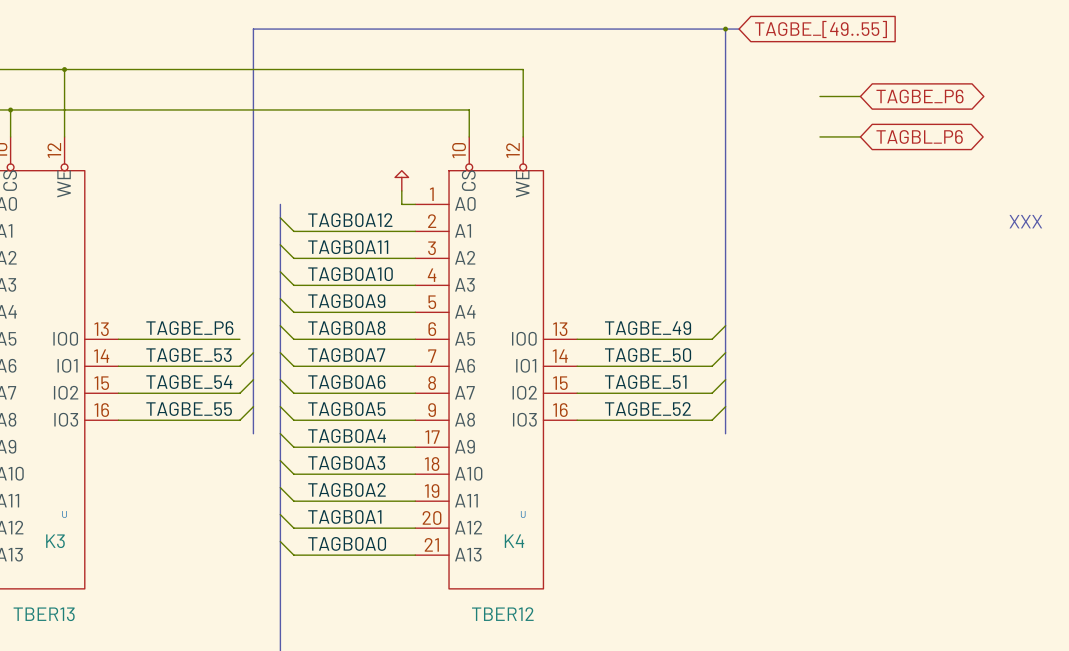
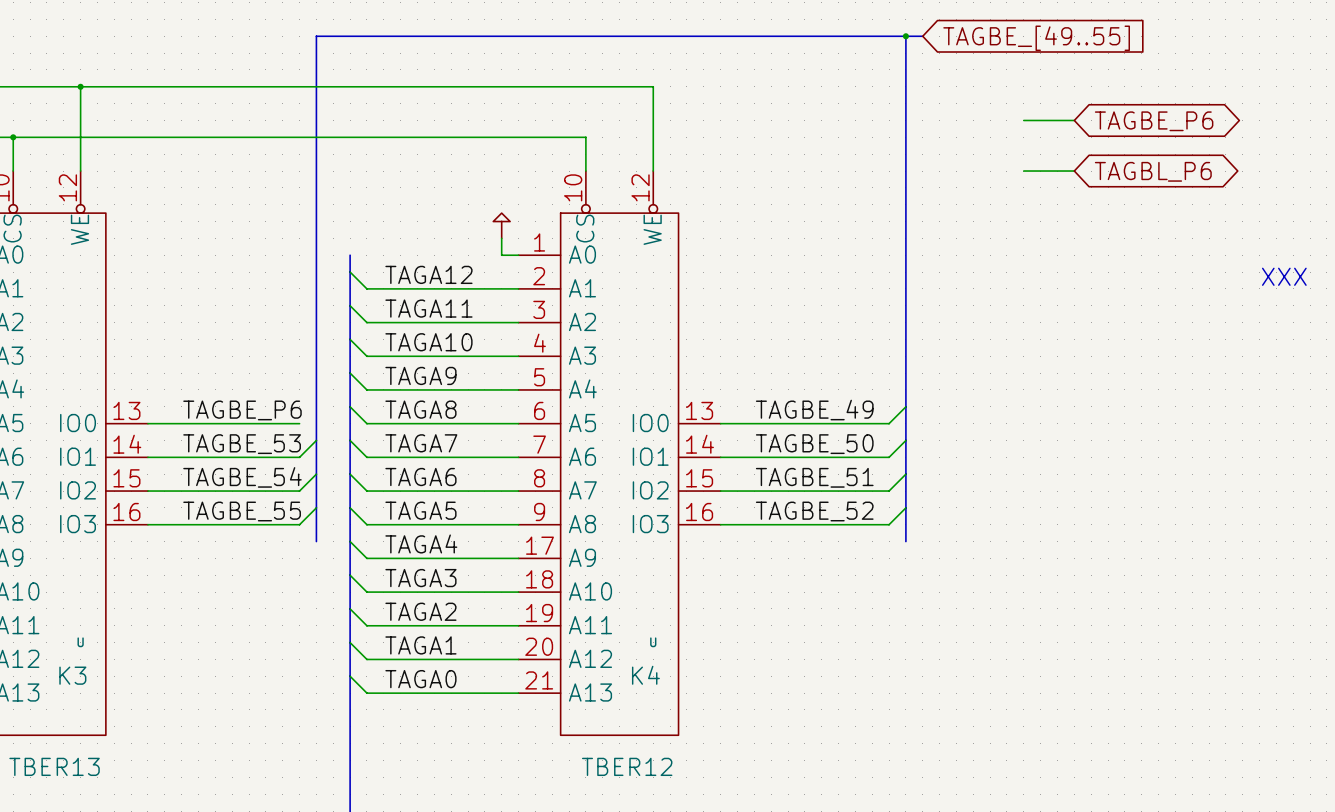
label: TAGB0A12 (350, 220) -> TAGA12 (428, 274)
label: TAGB0A11 (348, 247) -> TAGA11 (428, 308)
label: TAGB0A10 (350, 274) -> TAGA10 (428, 342)
label: TAGB0A9 (346, 301) -> TAGA9 (420, 375)
label: TAGB0A8 (346, 328) -> TAGA8 (420, 409)
label: TAGB0A7 (346, 355) -> TAGA7 (421, 443)
label: TAGB0A6 (346, 382) -> TAGA6 (420, 477)
label: TAGB0A5 (346, 409) -> TAGA5 (420, 510)
label: TAGB0A4 (347, 436) -> TAGA4 (421, 543)
label: TAGB0A3 (346, 462) -> TAGA3 (420, 578)
label: TAGB0A2 (346, 489) -> TAGA2 (420, 611)
label: TAGB0A1 (344, 516) -> TAGA1 (420, 645)
label: TAGB0A0 (347, 543) -> TAGA0 (420, 679)

